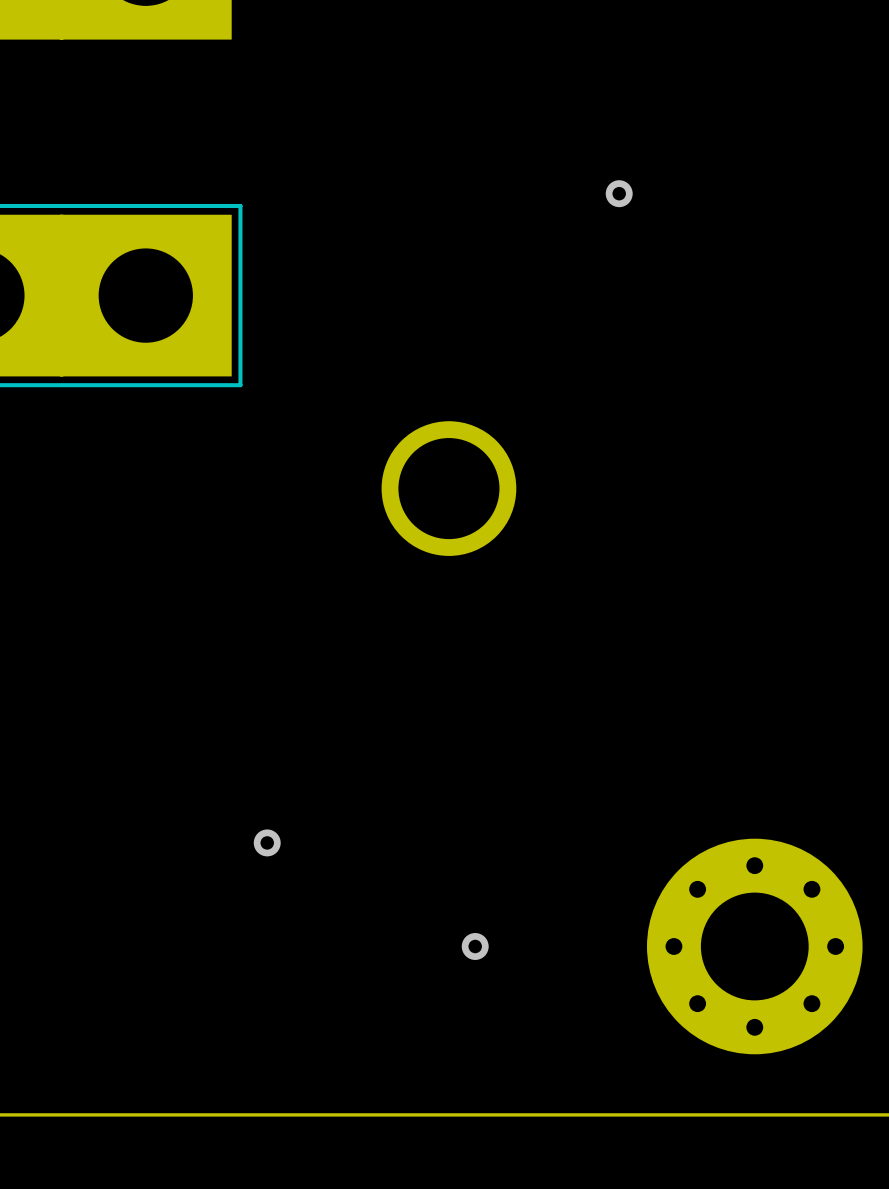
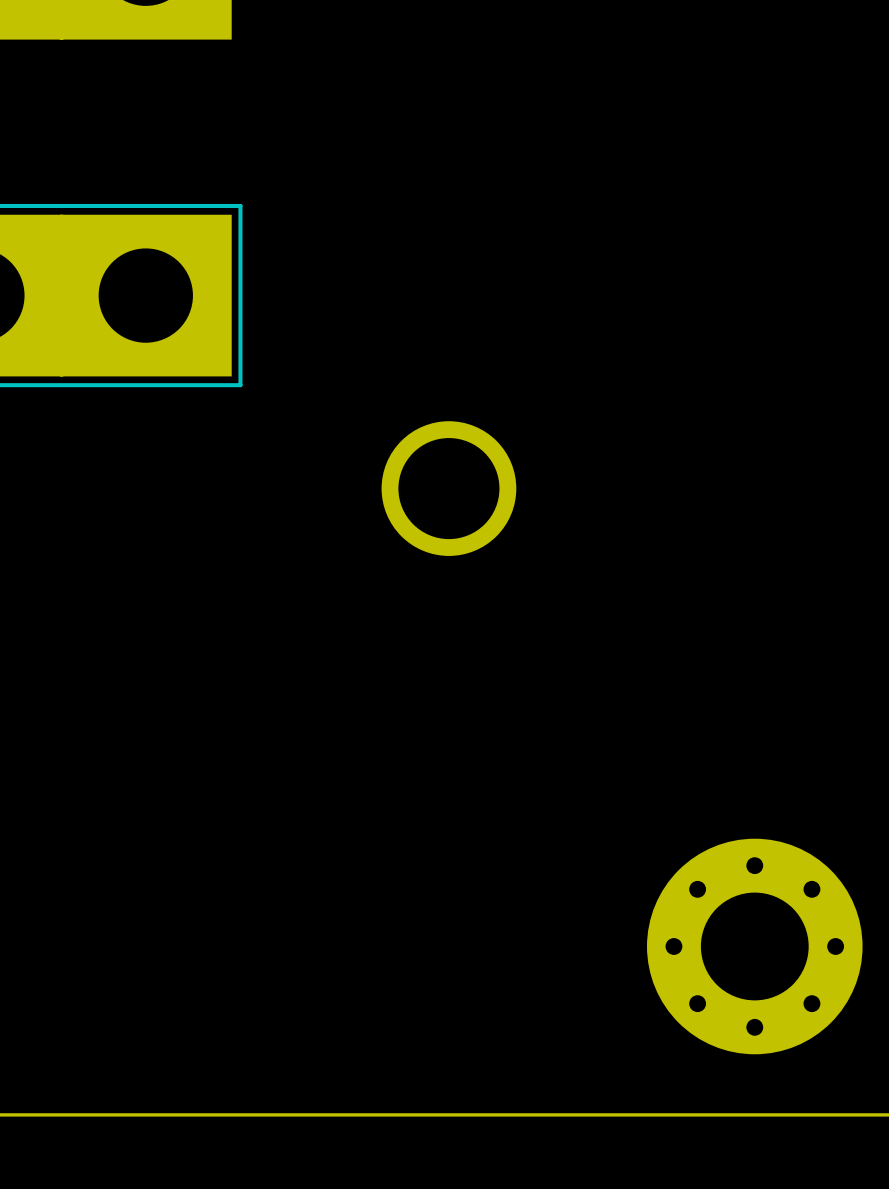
via: (619, 193) -> none
via: (267, 842) -> none
via: (475, 946) -> none

